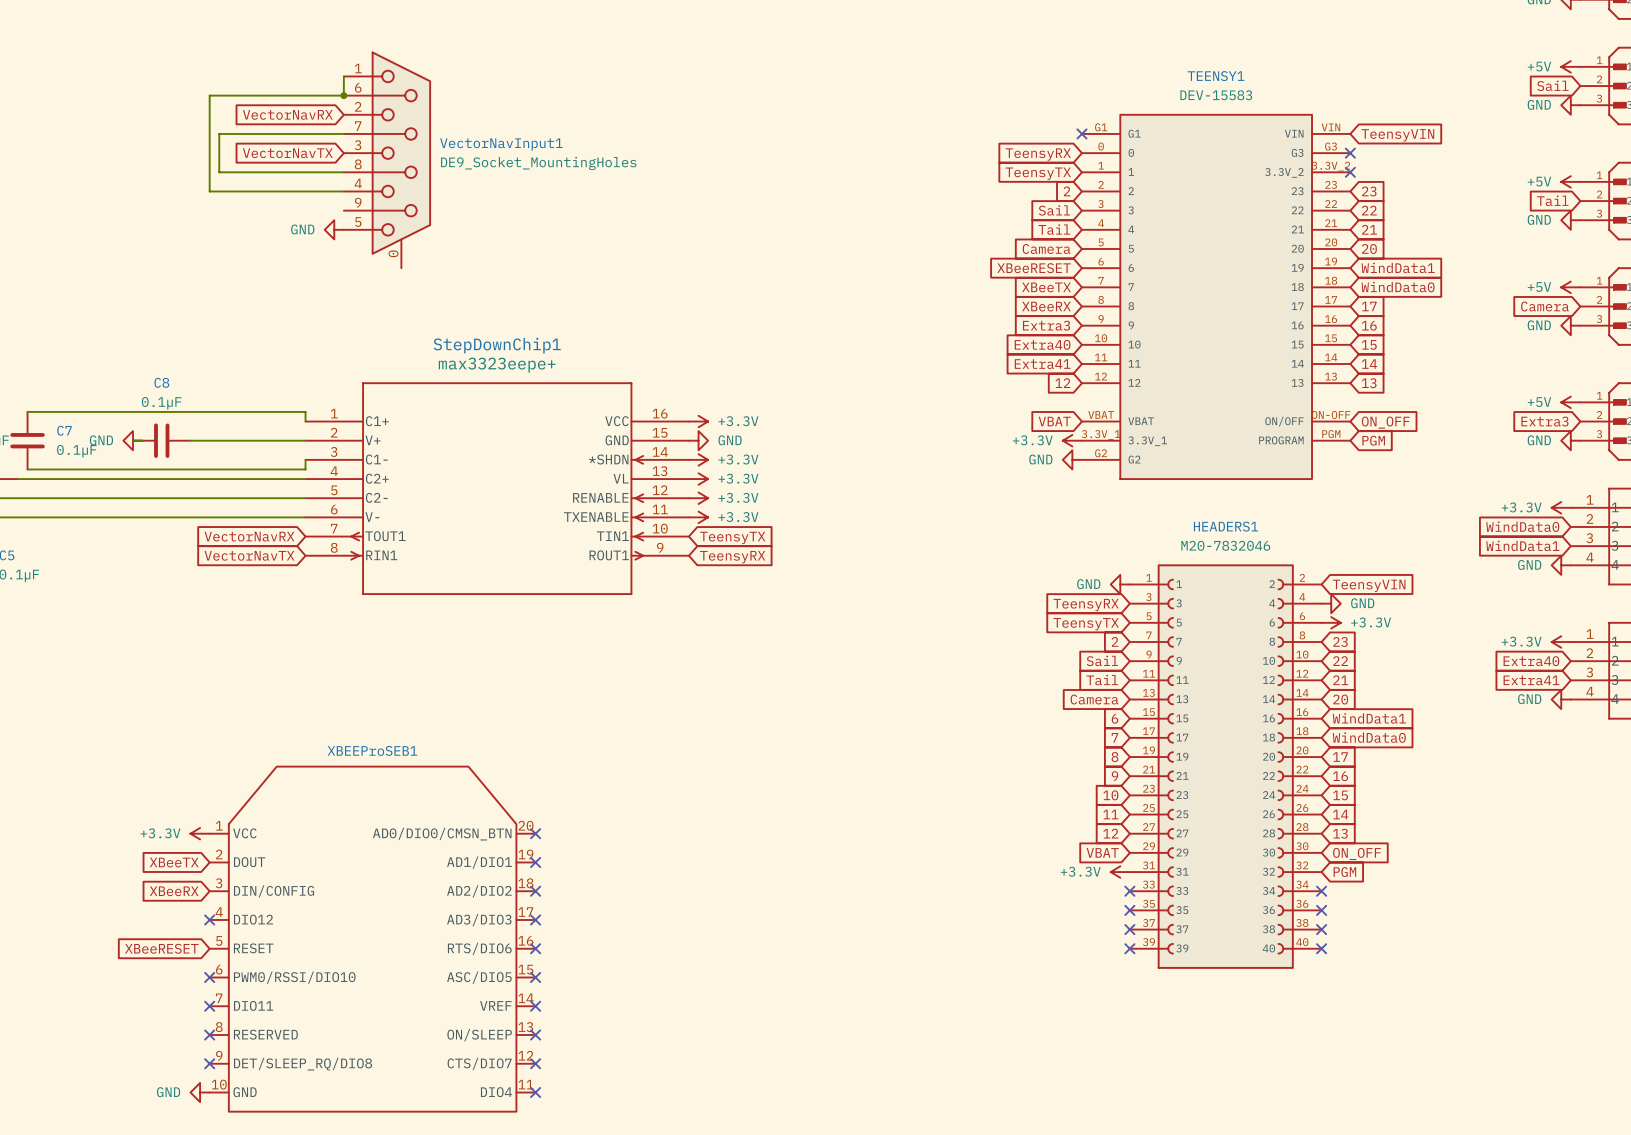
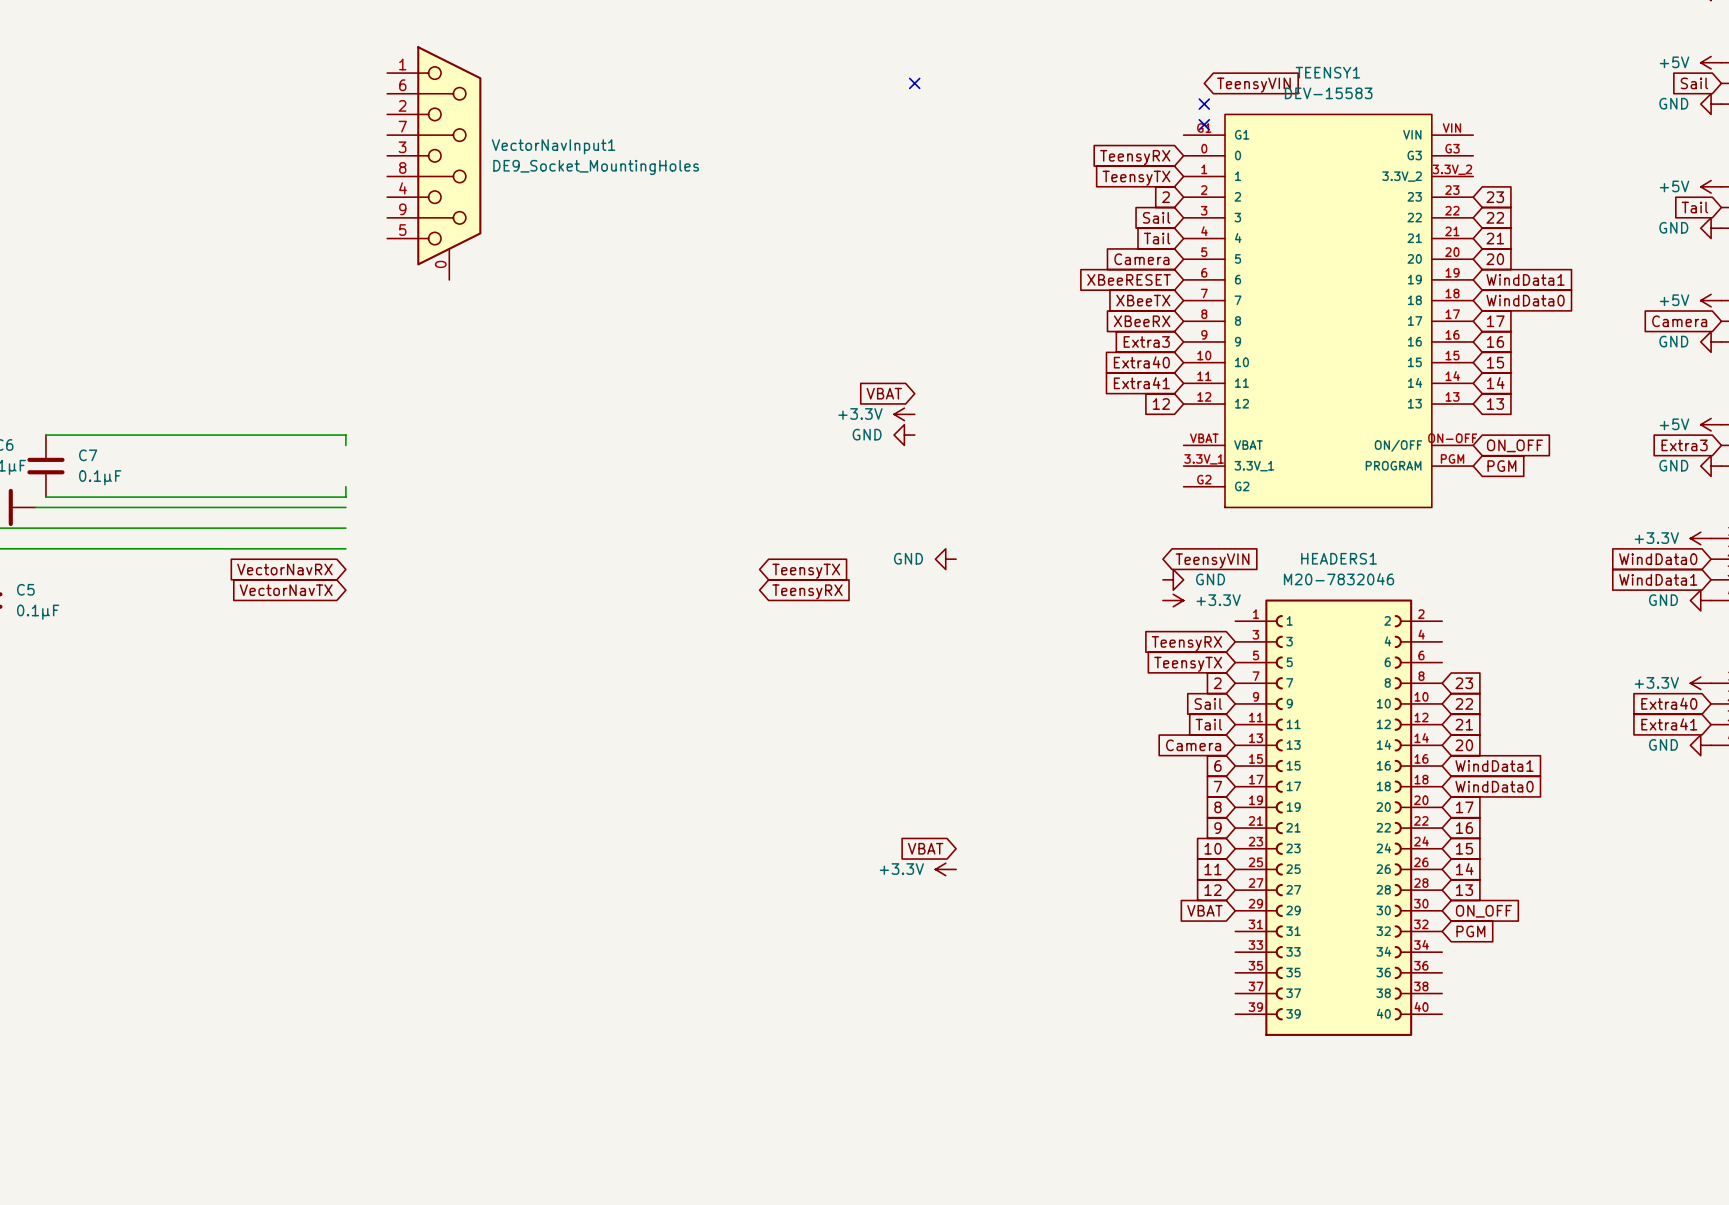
wire: (343, 76) (343, 95) (209, 95) (209, 191) (343, 191) -> none
no-connect mark: none -> (914, 83)
global label: none -> TeensyVIN (1253, 85)
junction: (343, 95) -> none
no-connect mark: none -> (1204, 104)
global label: VectorNavRX (287, 114) -> none
no-connect mark: none -> (1204, 124)
wire: (343, 133) (219, 133) (219, 172) (343, 172) -> none
no-connect mark: (1081, 133) -> none
global label: TeensyVIN (1397, 135) -> none
global label: VectorNavTX (287, 153) -> none
no-connect mark: (1350, 153) -> none
no-connect mark: (1350, 172) -> none
power symbol: GND (334, 229) -> none
global label: none -> VBAT (884, 393)
power symbol: none -> +3.3V (904, 414)
power symbol: none -> GND (904, 435)
power symbol: +3.3V (698, 421) -> none
global label: VBAT (1054, 421) -> none
wire: (132, 440) (142, 440) -> none
power symbol: GND (132, 440) -> none
C8: 0.1µF (161, 440) -> none
wire: (190, 440) (305, 440) -> none
power symbol: GND (698, 440) -> none
power symbol rotation: 0° (1072, 440) -> 180° (1173, 600)
power symbol position: +3.3V (1072, 440) -> +3.3V (1173, 600)
power symbol: +3.3V (698, 459) -> none
power symbol: GND (1072, 459) -> none
power symbol: +3.3V (698, 479) -> none
StepDownChip1: max3323eepe+ (497, 488) -> none
power symbol: +3.3V (698, 498) -> none
power symbol: +3.3V (698, 517) -> none
power symbol: none -> GND (945, 559)
global label: none -> TeensyVIN (1212, 560)
power symbol: none -> GND (1173, 579)
power symbol: GND (1120, 584) -> none
global label: TeensyVIN (1369, 585) -> none
power symbol: GND (1331, 603) -> none
power symbol: +3.3V (1331, 622) -> none
global label: none -> VBAT (925, 848)
power symbol: none -> +3.3V (945, 869)
power symbol: +3.3V (200, 833) -> none
no-connect mark: (535, 833) -> none
global label: XBeeTX (174, 862) -> none
no-connect mark: (535, 862) -> none
power symbol: +3.3V (1120, 872) -> none
global label: XBeeRX (174, 891) -> none
no-connect mark: (535, 891) -> none
no-connect mark: (1129, 891) -> none
no-connect mark: (1321, 891) -> none
no-connect mark: (1129, 910) -> none
no-connect mark: (1321, 910) -> none
no-connect mark: (209, 919) -> none
no-connect mark: (535, 919) -> none
no-connect mark: (1129, 929) -> none
no-connect mark: (1321, 929) -> none
XBEEProSEB1: (372, 939) -> none
global label: XBeeRESET (161, 948) -> none
no-connect mark: (535, 948) -> none
no-connect mark: (1129, 948) -> none
no-connect mark: (1321, 948) -> none
no-connect mark: (209, 977) -> none
no-connect mark: (535, 977) -> none
no-connect mark: (209, 1006) -> none
no-connect mark: (535, 1006) -> none
no-connect mark: (209, 1035) -> none
no-connect mark: (535, 1035) -> none
no-connect mark: (209, 1063) -> none
no-connect mark: (535, 1063) -> none
power symbol: GND (200, 1092) -> none
no-connect mark: (535, 1092) -> none

